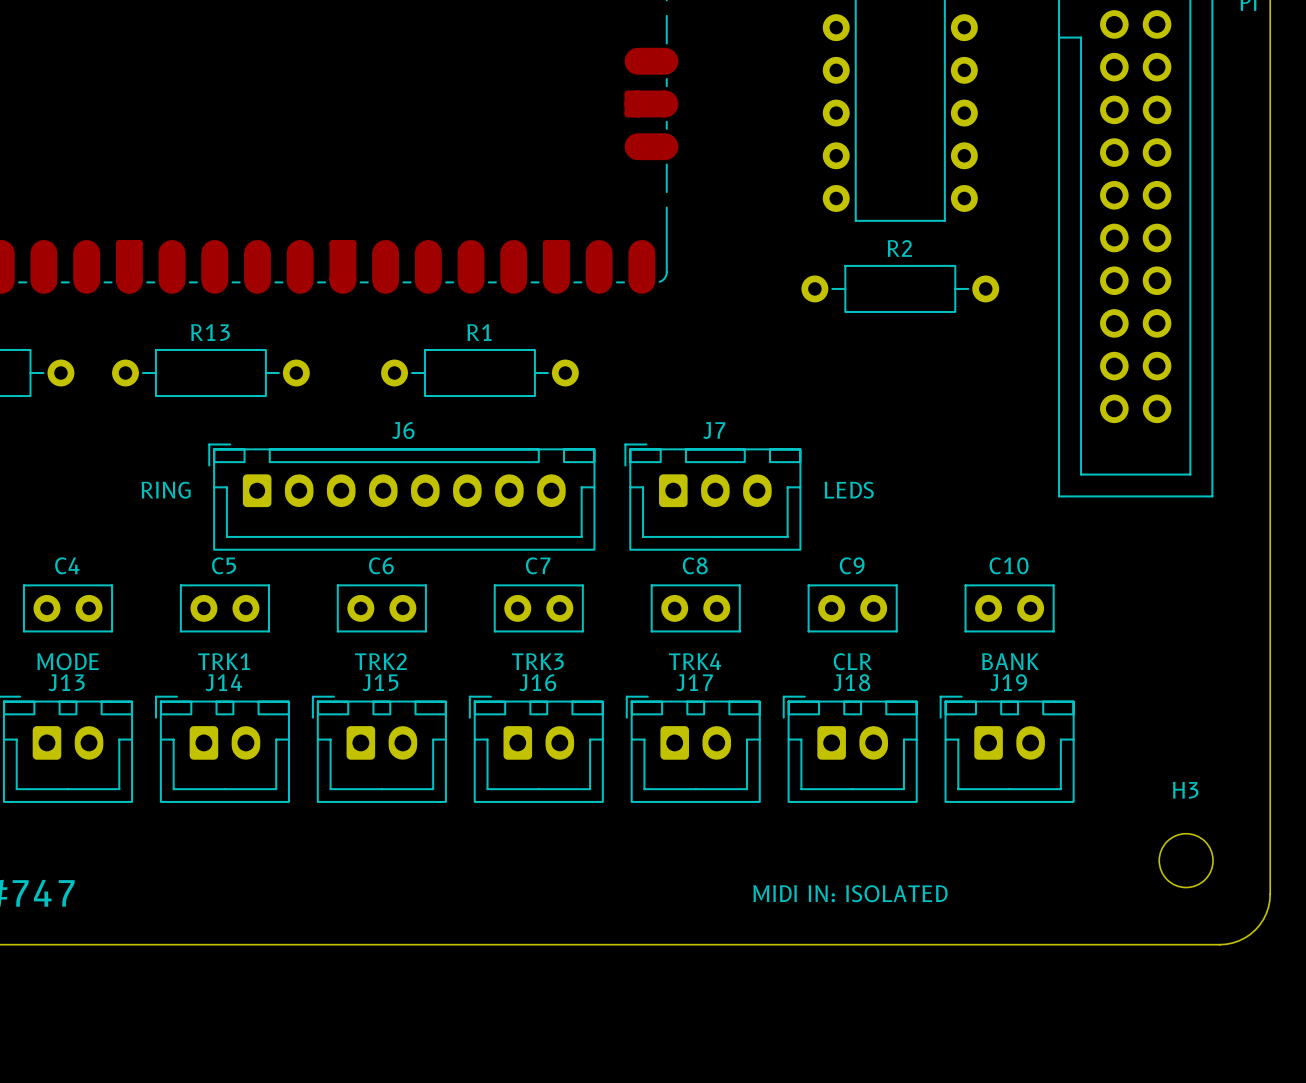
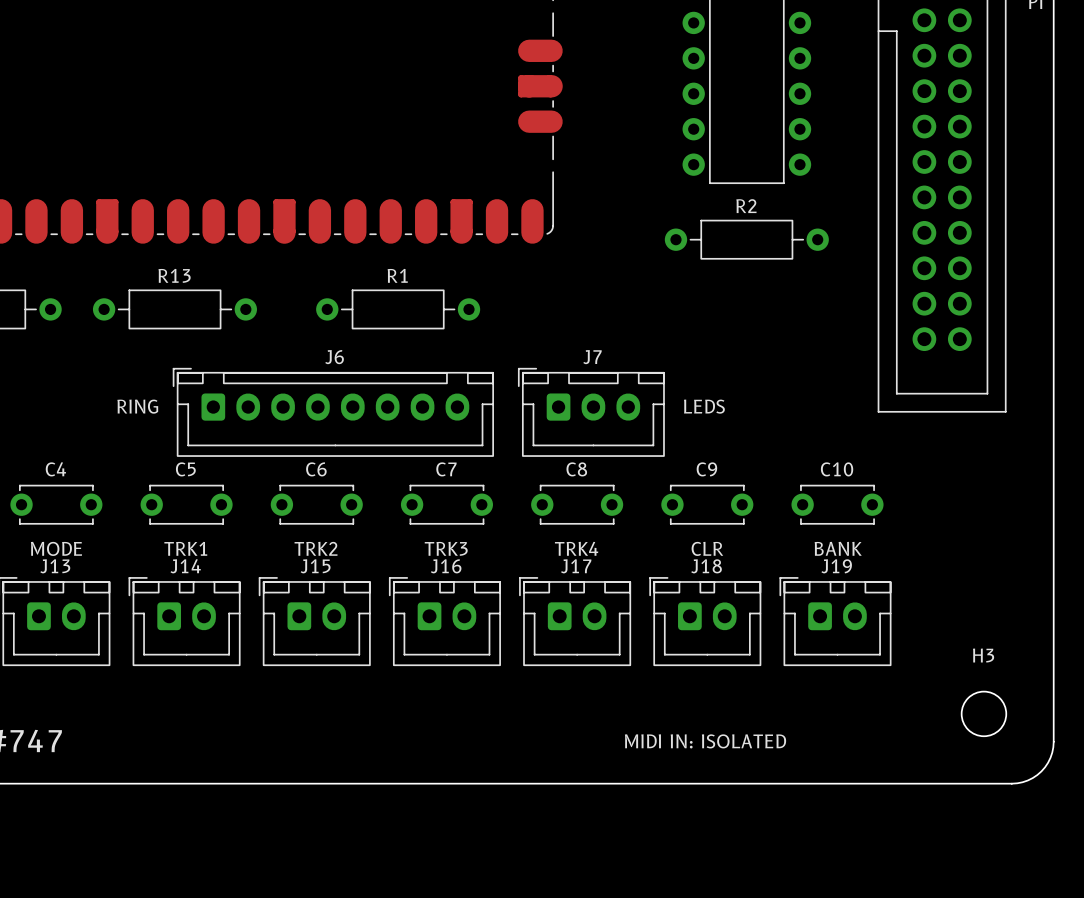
C4 footprint: [22, 584, 114, 633] -> [10, 484, 103, 525]
C5 footprint: [179, 584, 270, 633] -> [140, 484, 233, 525]
C6 footprint: [336, 584, 427, 633] -> [270, 484, 363, 525]
C7 footprint: [493, 584, 584, 633] -> [400, 484, 493, 525]
C8 footprint: [650, 584, 741, 633] -> [531, 484, 624, 525]
C9 footprint: [807, 584, 898, 633] -> [661, 484, 754, 525]
C10 footprint: [964, 584, 1055, 633] -> [791, 484, 884, 525]

